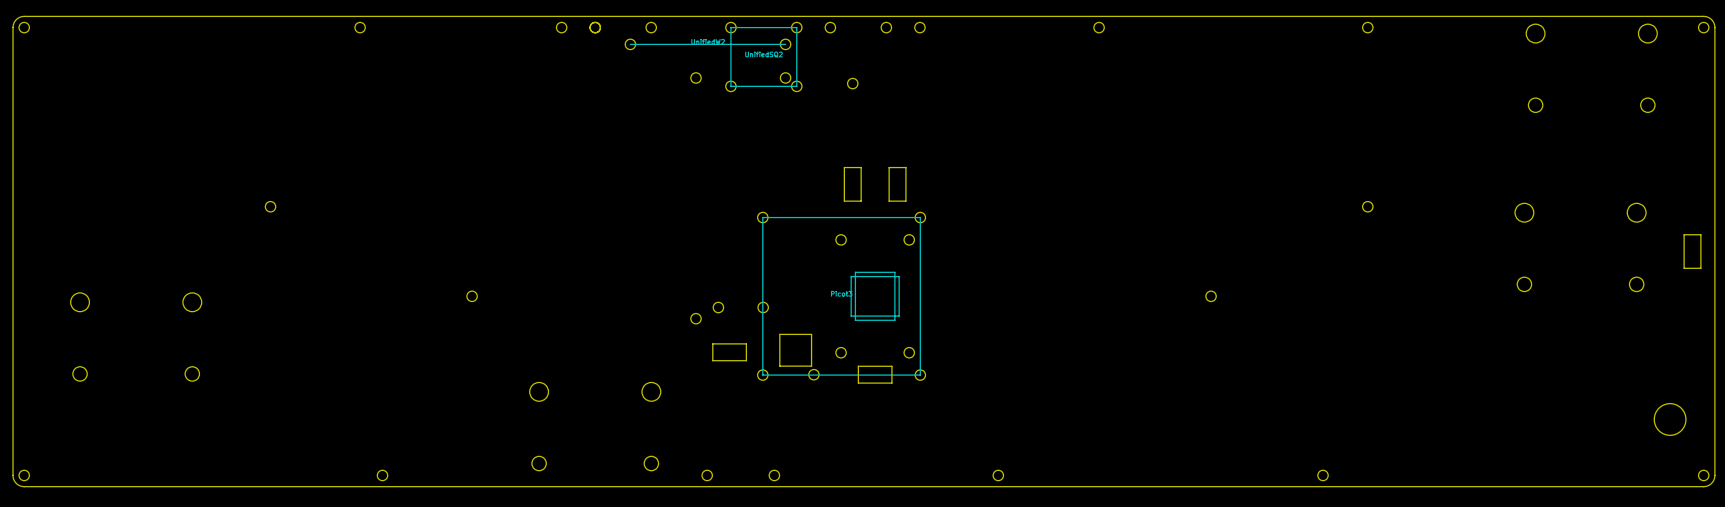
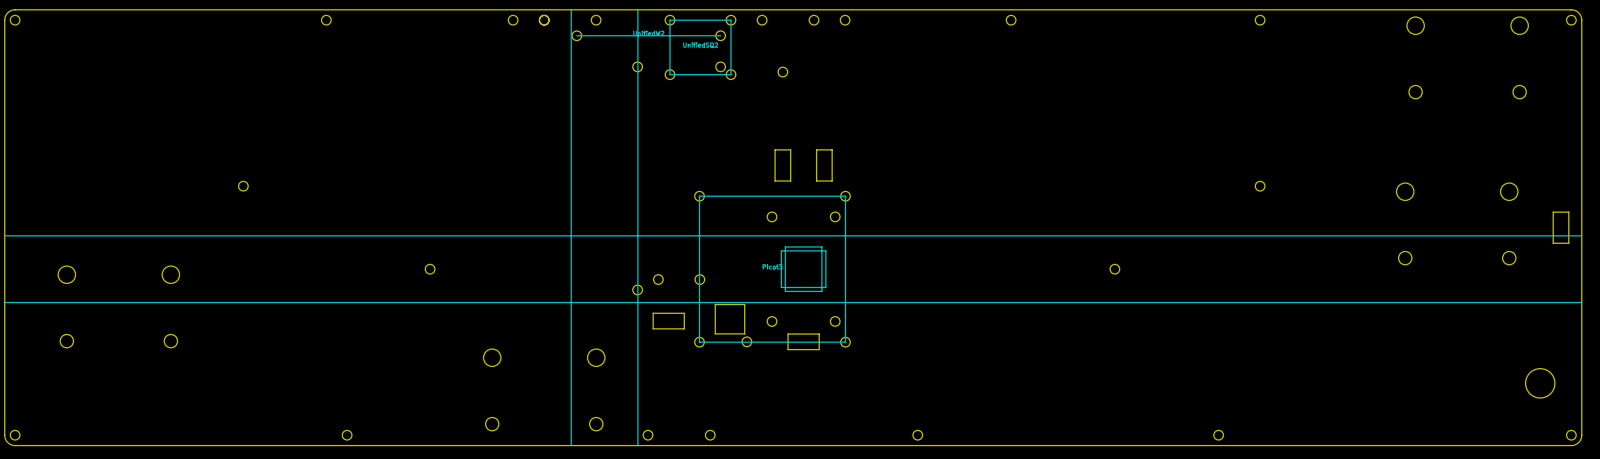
line: none -> (571, 9) (571, 445)
line: none -> (637, 9) (637, 445)
line: none -> (4, 235) (1581, 235)
line: none -> (4, 302) (1581, 302)

